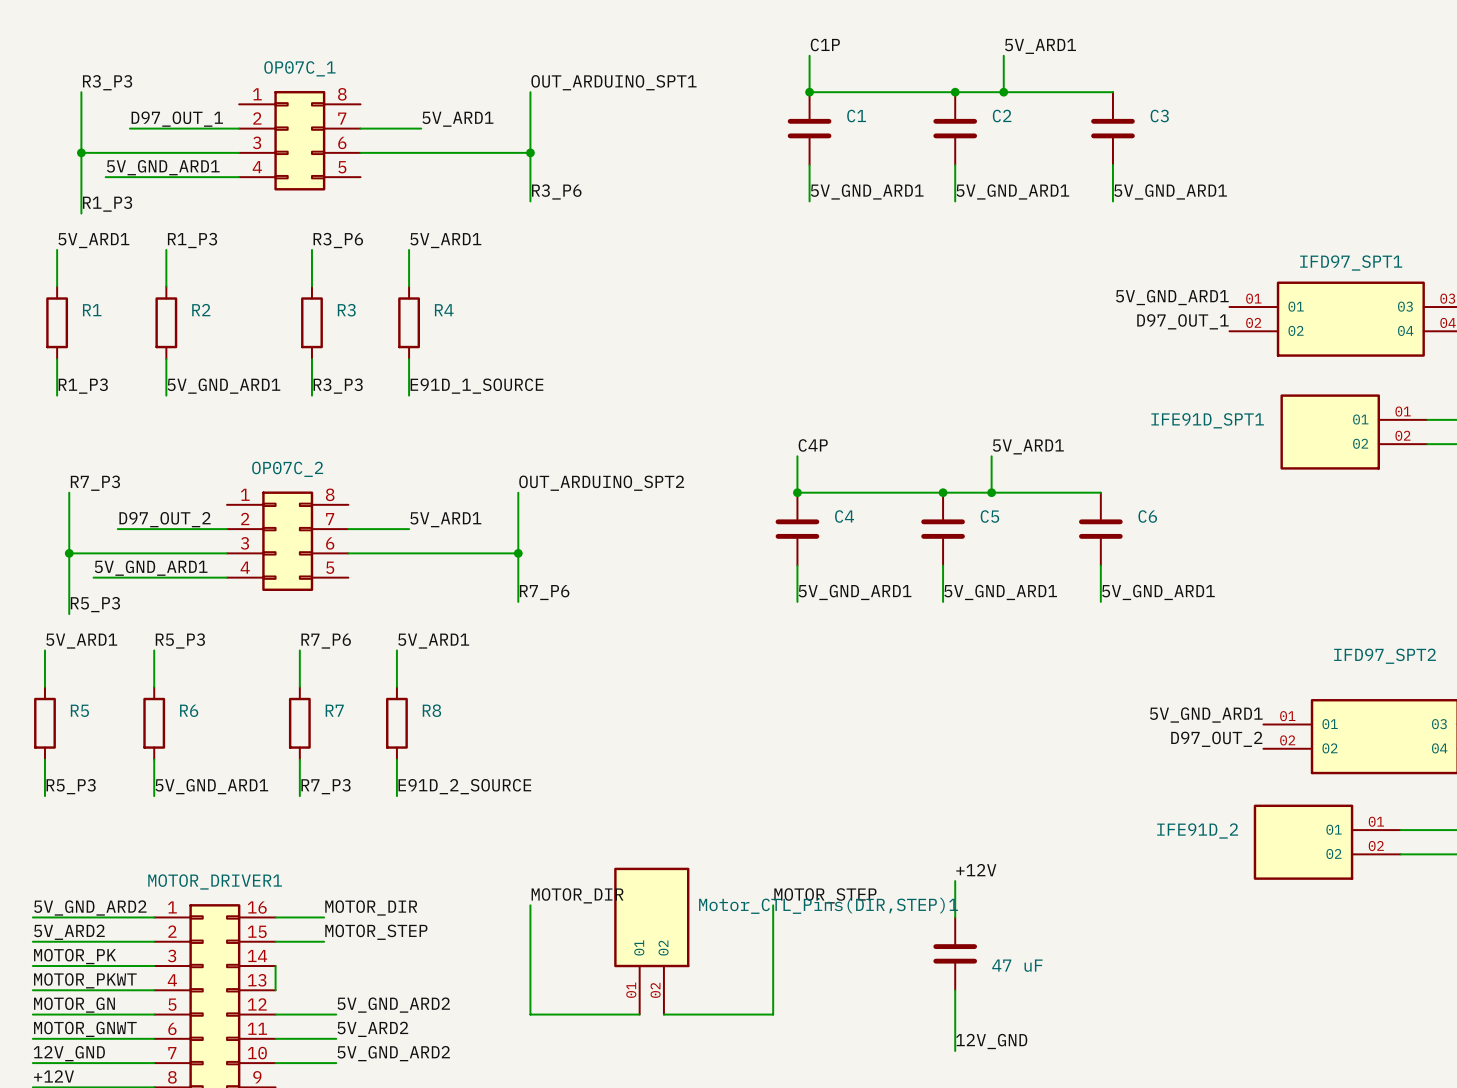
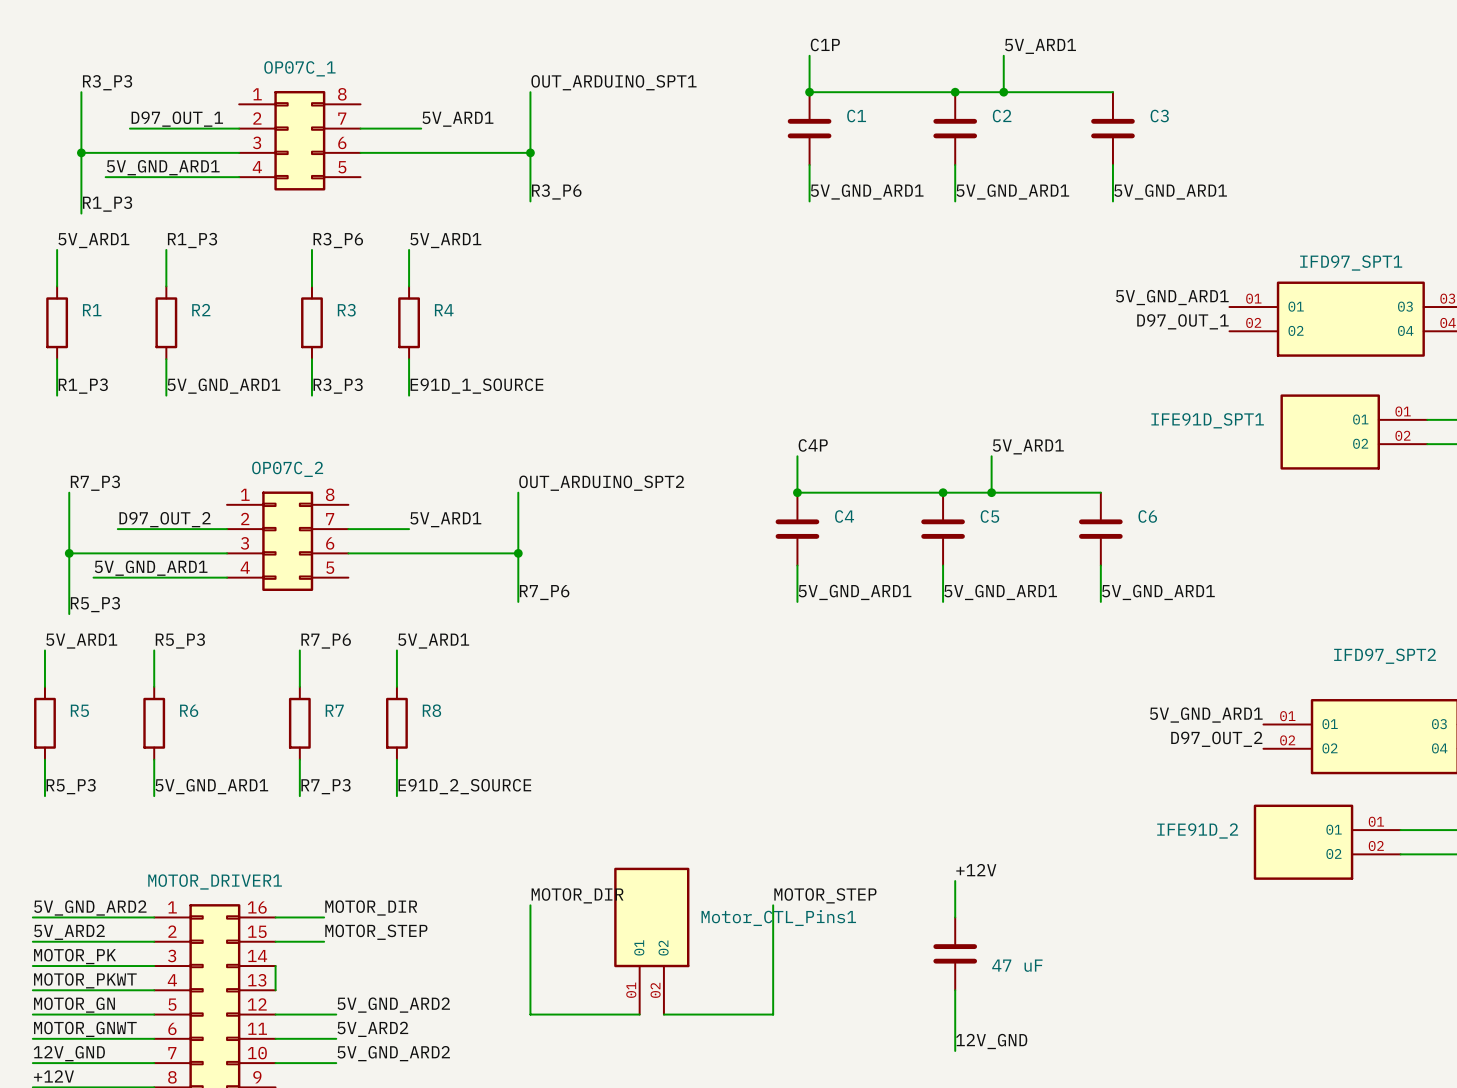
Motor_CTL_Pins(DIR,STEP)1 name: Motor_CTL_Pins(DIR,STEP)1 (828, 905) -> Motor_CTL_Pins1 (778, 918)

